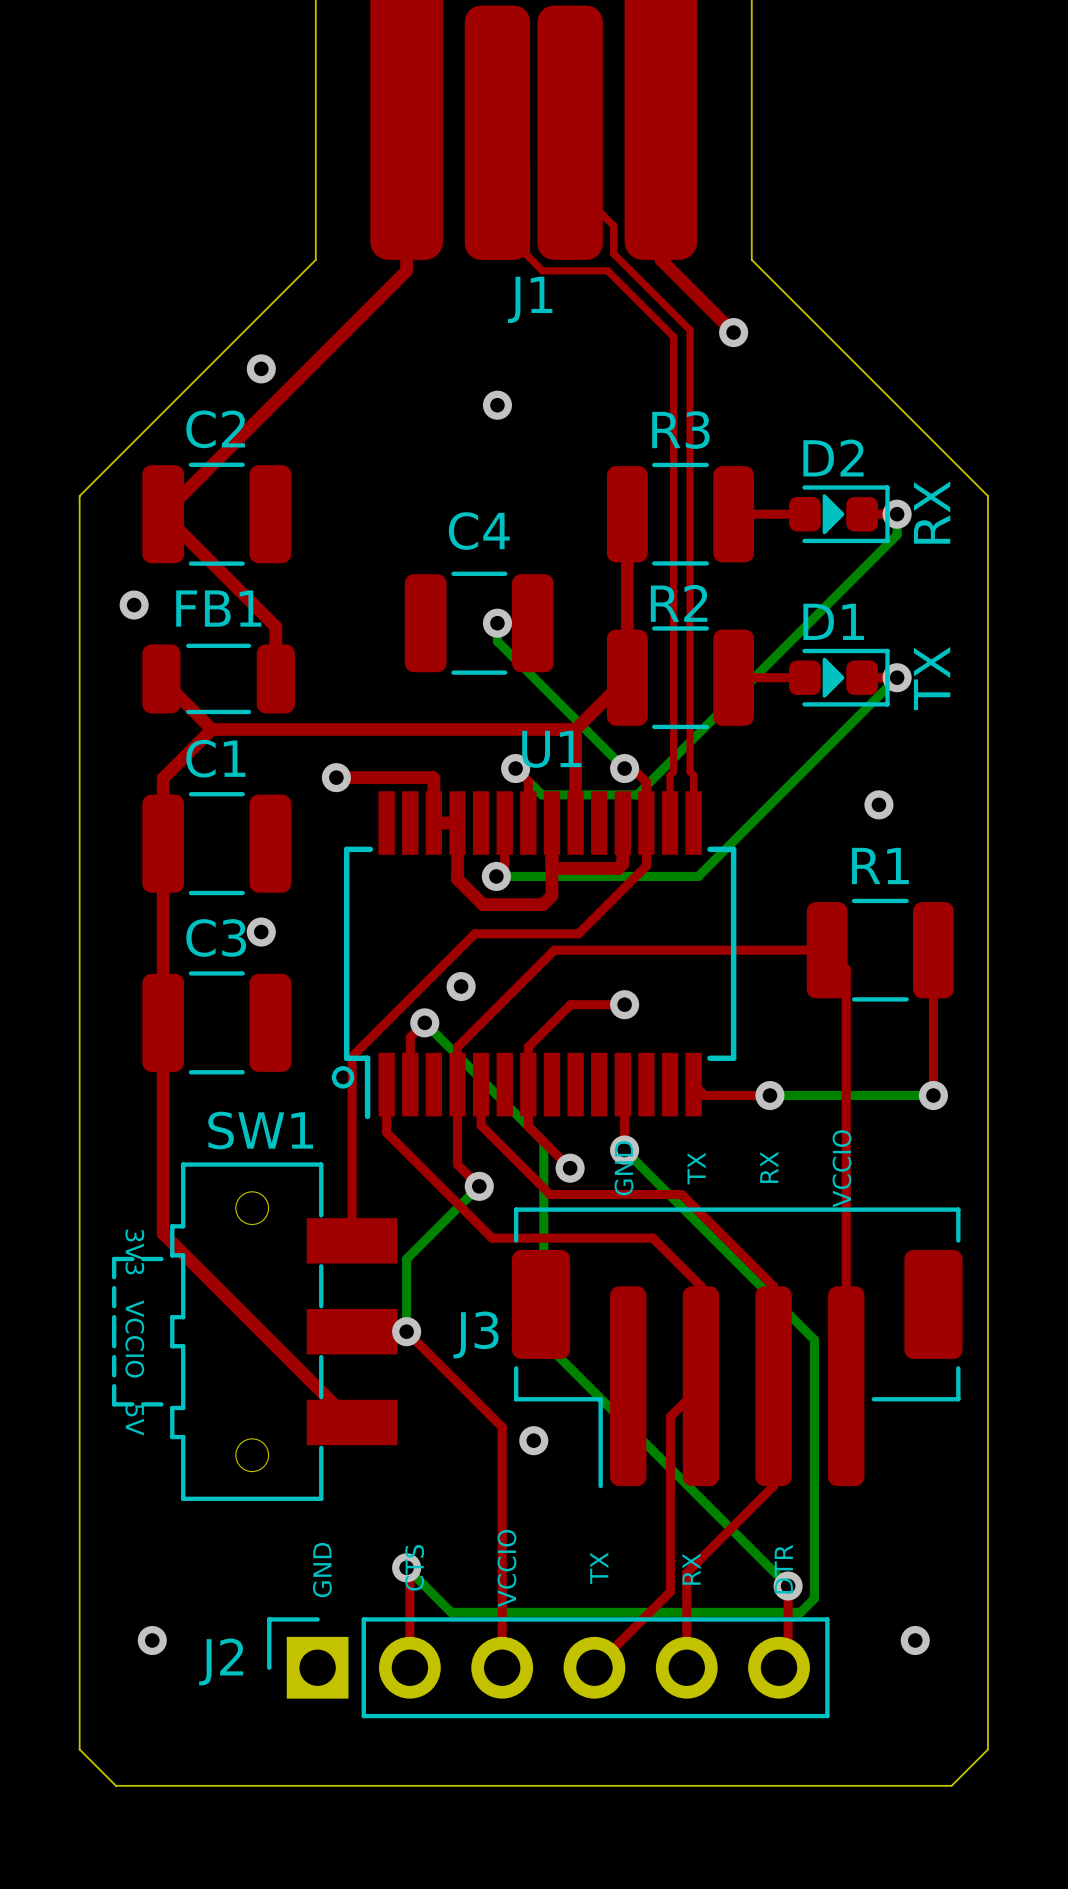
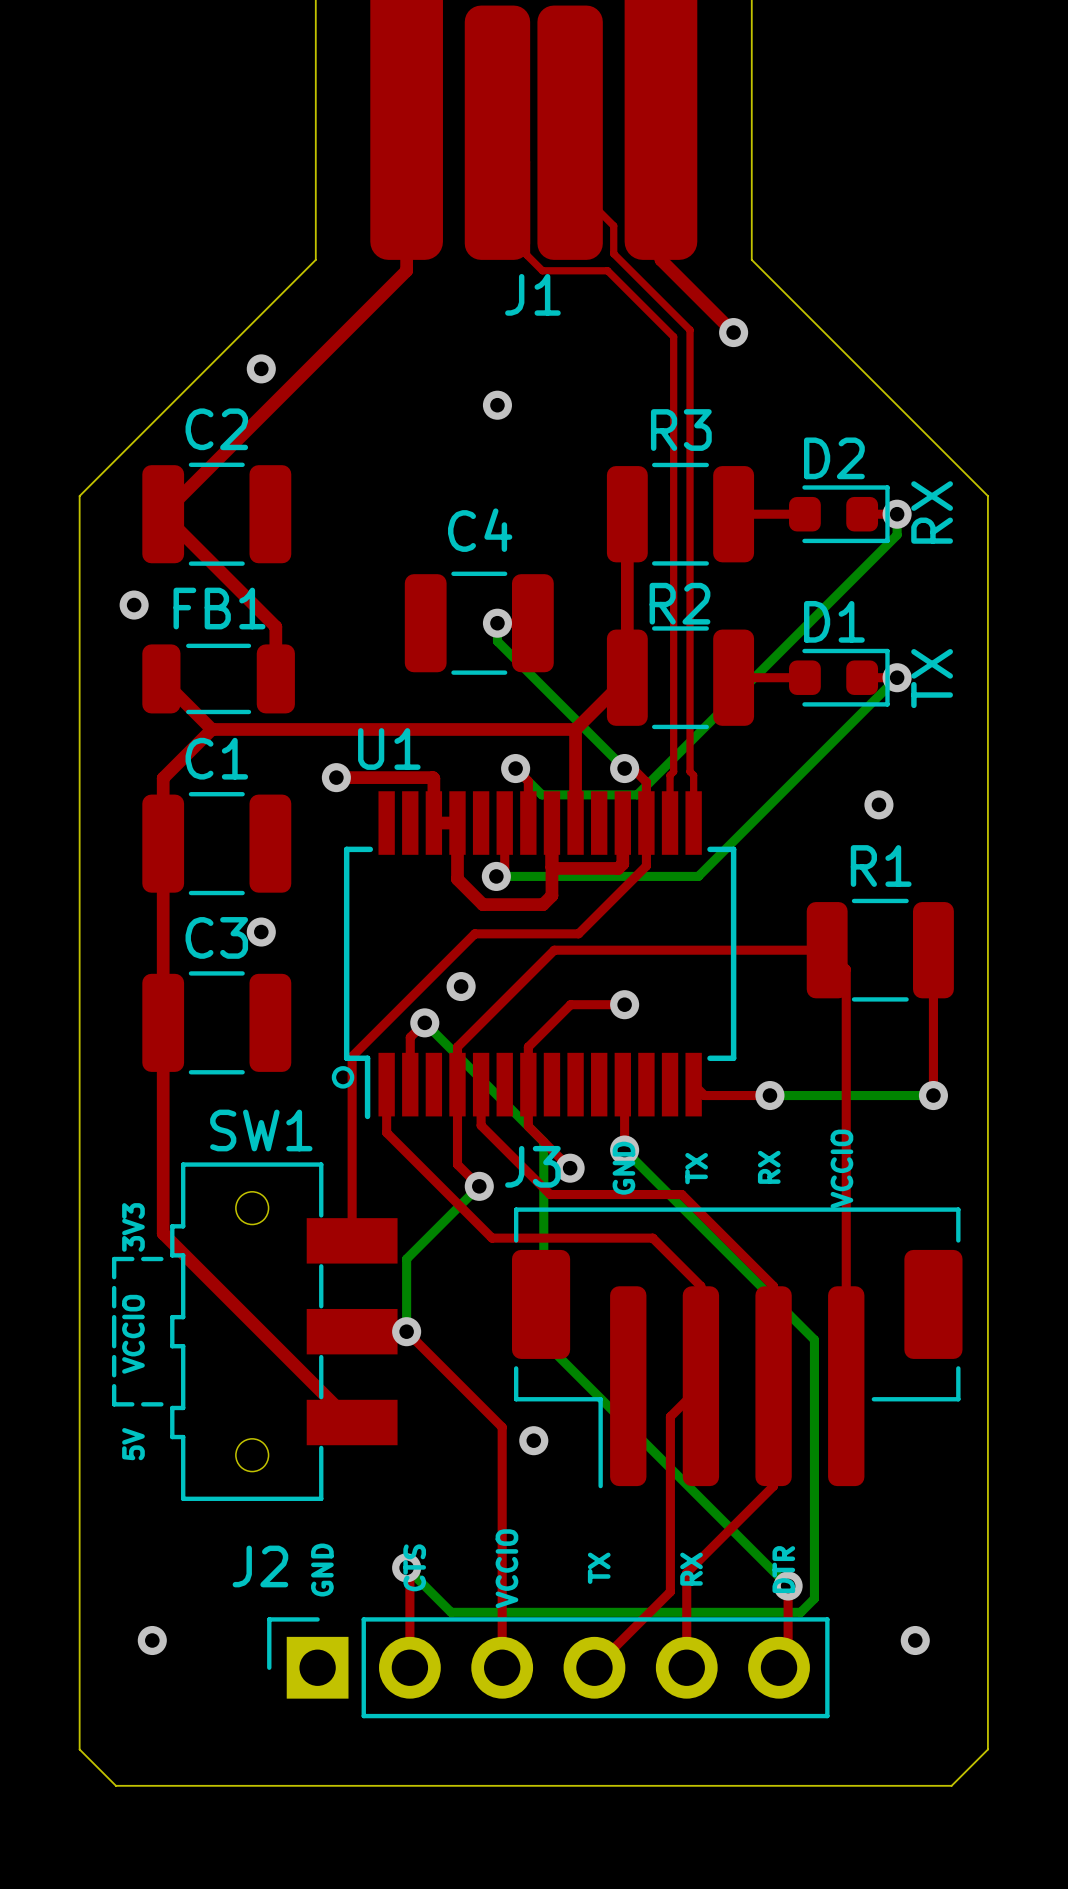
D2 footprint: [789, 485, 890, 544] -> [789, 485, 890, 544]
D1 footprint: [789, 648, 890, 707] -> [789, 648, 890, 707]
U1 name position: U1 (551, 749) -> U1 (389, 749)
text: 3V3 VCCIO 5V (134, 1332) -> 5V VCCIO 3V3 (133, 1331)
J3 name position: J3 (476, 1334) -> J3 (532, 1166)
J2 name position: J2 (221, 1661) -> J2 (260, 1566)

